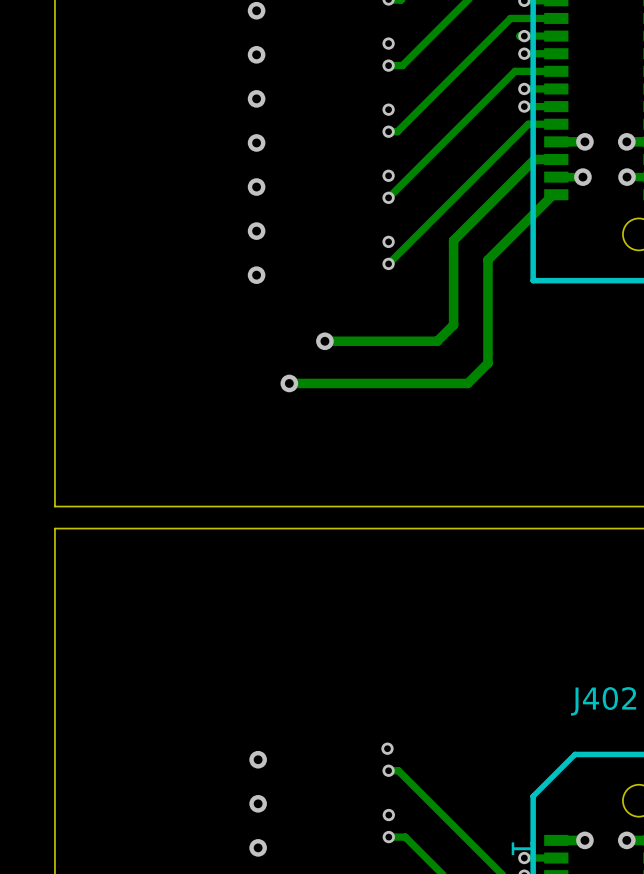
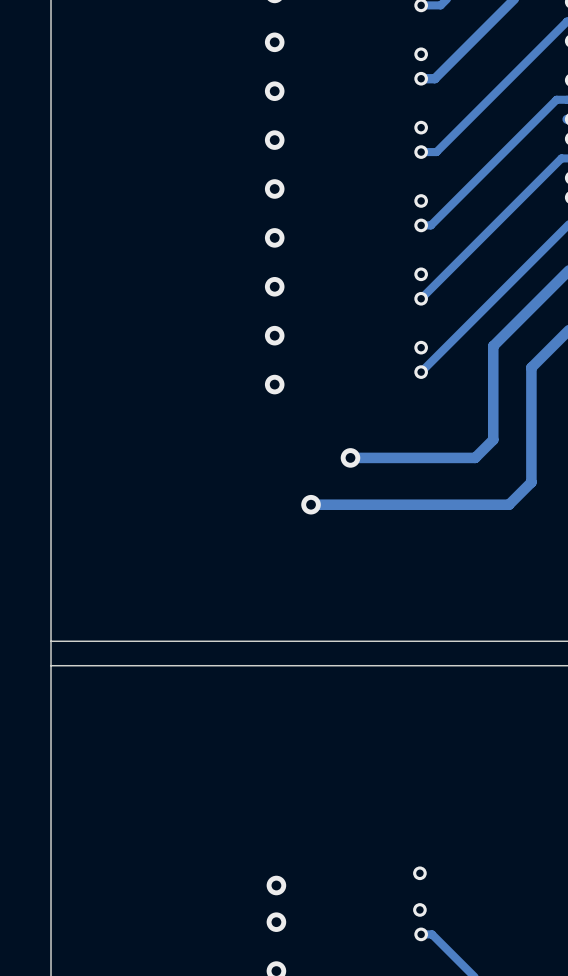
board edge: none -> (51, 641) (51, 665)
via: none -> (419, 873)
via: none -> (276, 885)

